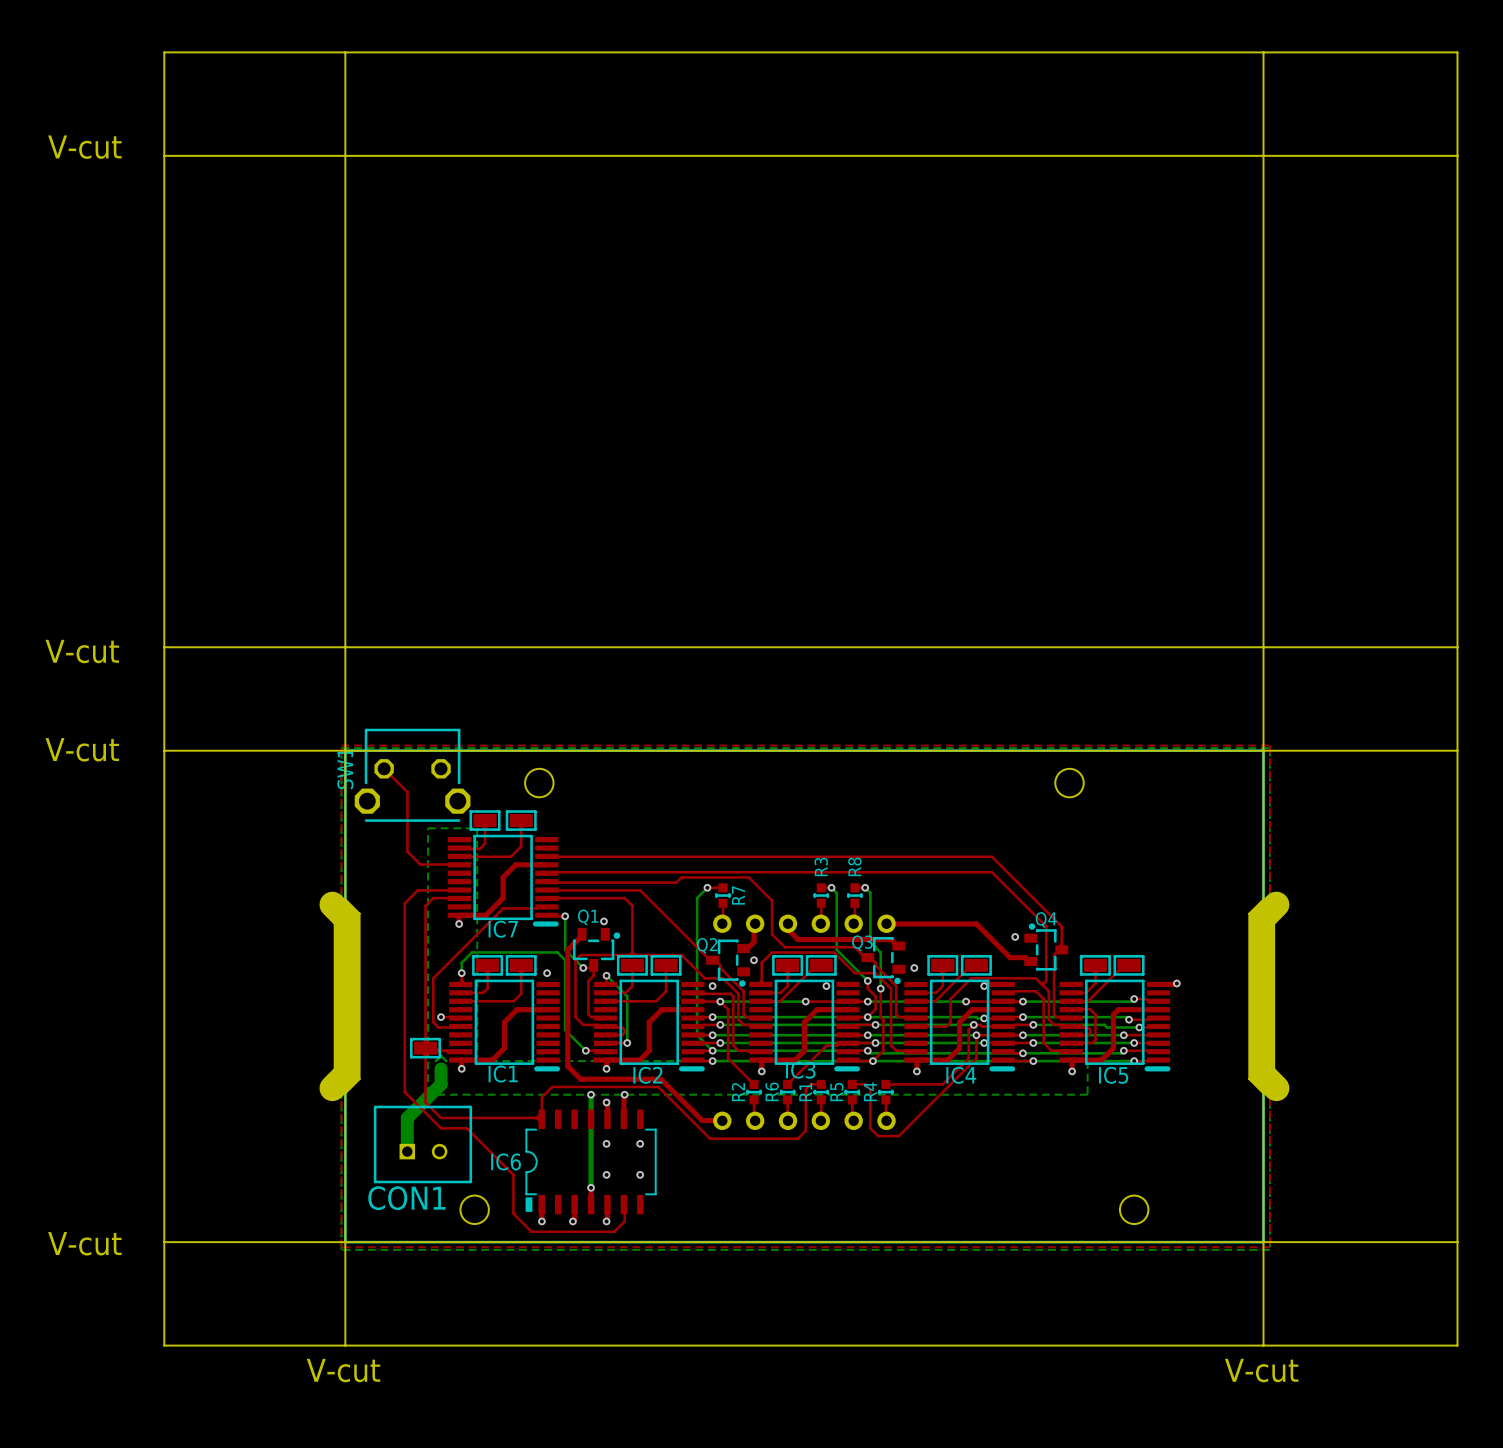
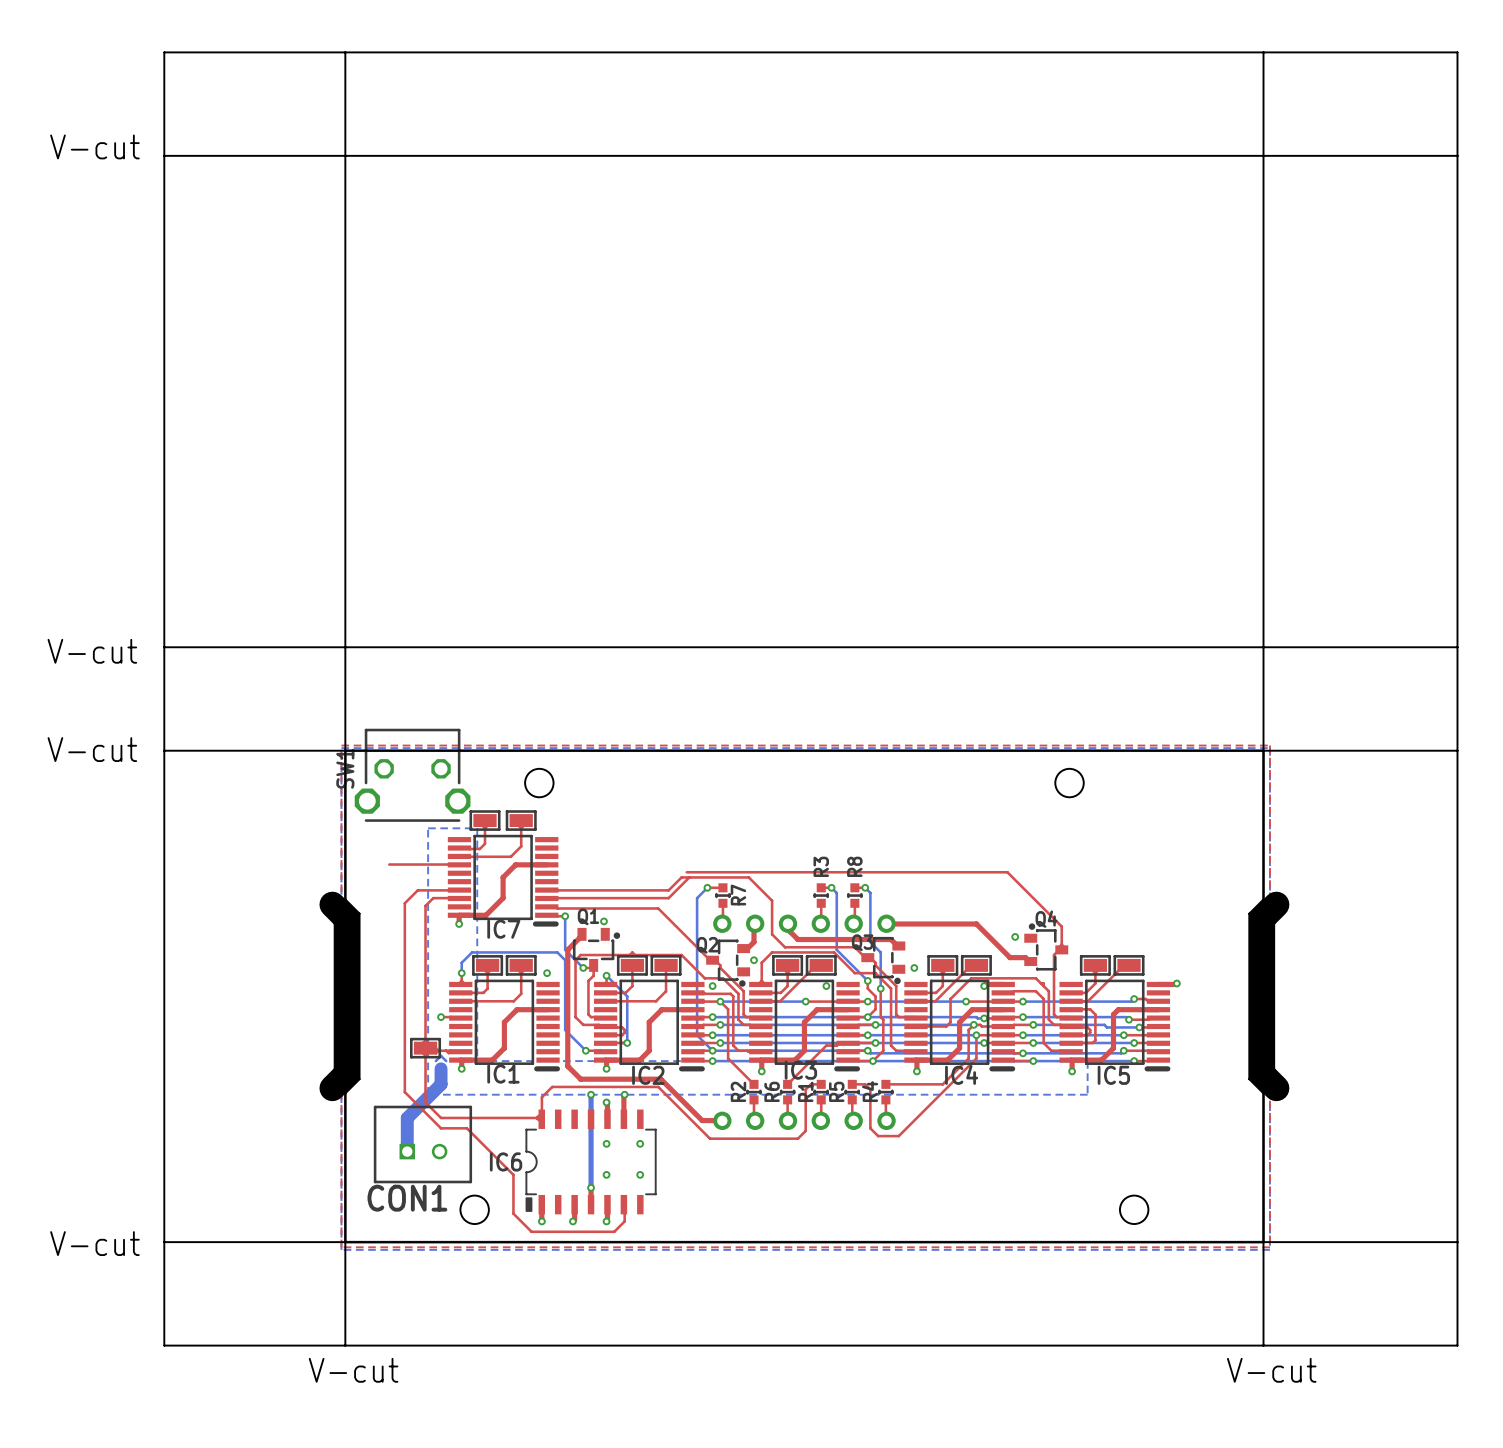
top track: (384, 768) (407, 792) (407, 851) (420, 864) -> (389, 864) (420, 864)
top track: (546, 856) (991, 856) (1007, 872) -> none
top track: (686, 872) (546, 873) -> none
top track: (991, 872) (1046, 926) (1046, 980) (1042, 984) -> (991, 872) (1007, 872)
top track: (546, 881) (676, 882) -> none
top track: (640, 890) (658, 908) -> (640, 890) (668, 890) (676, 882)
top track: (624, 898) (632, 905) (632, 955) -> (624, 898) (668, 898) (689, 877)
top track: (546, 906) (503, 908) (433, 978) (433, 1022) (438, 1027) (460, 1026) -> (546, 906) (658, 908)

